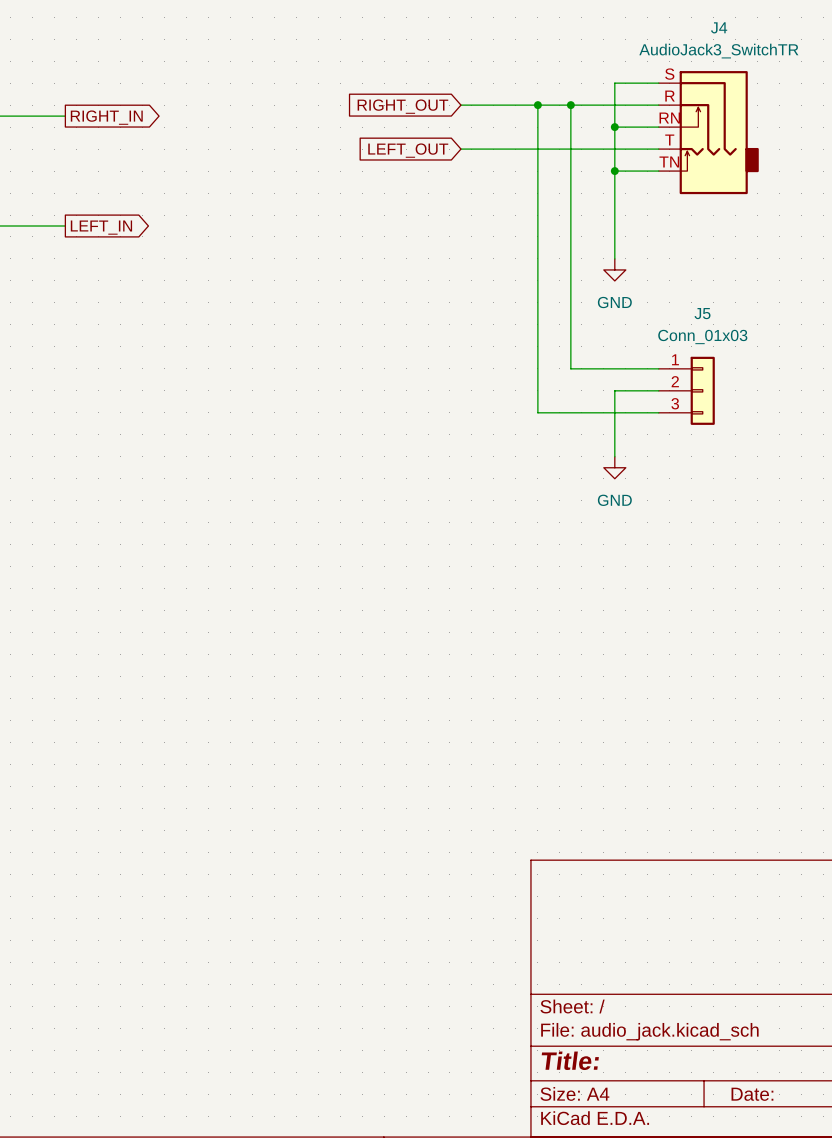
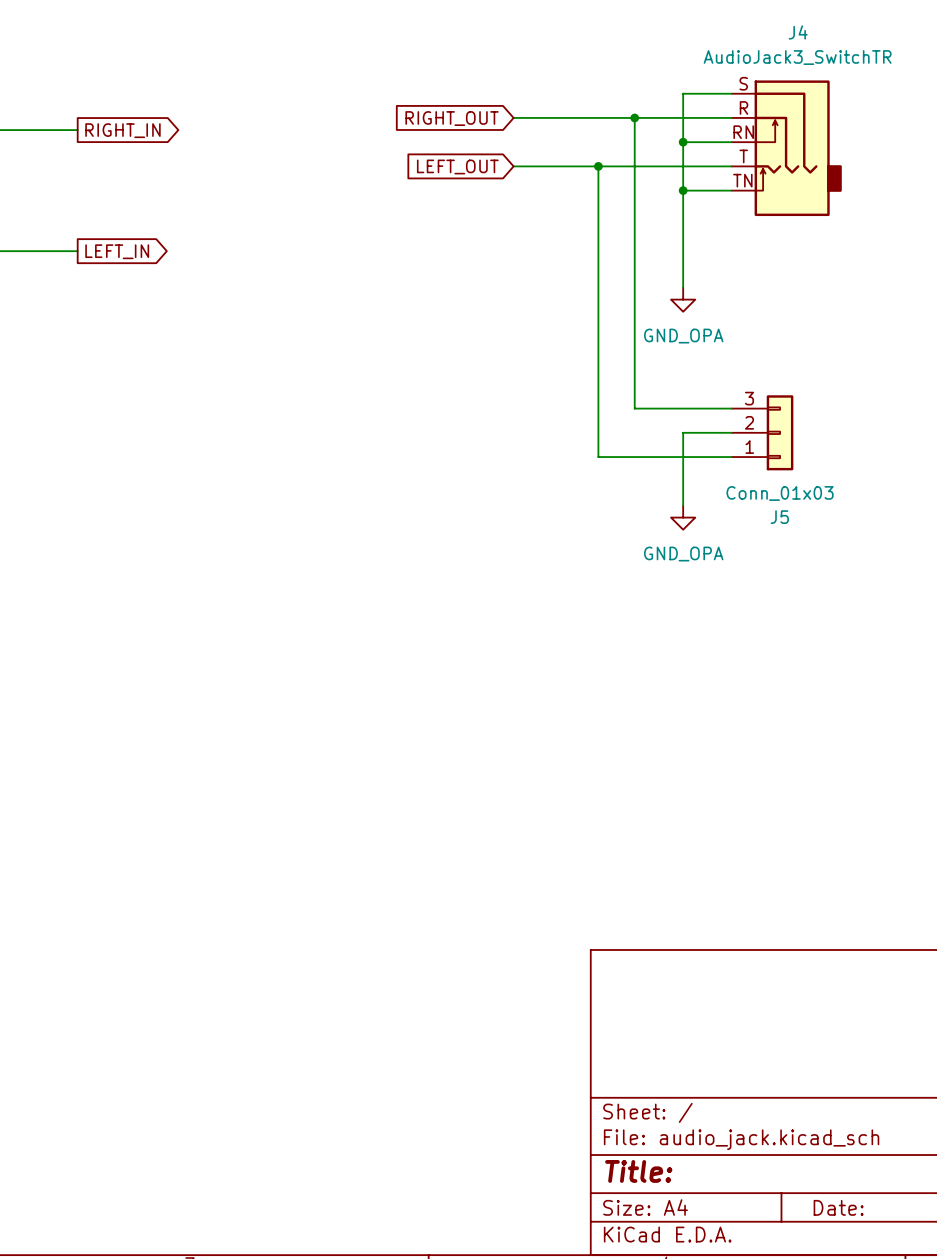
wire: (537, 105) (537, 149) -> none
junction position: (537, 105) -> (598, 166)
power symbol: GND (614, 269) -> GND_OPA (683, 299)
J5 flip: as is (702, 390) -> up-down (780, 432)
power symbol: GND (614, 467) -> GND_OPA (683, 517)

